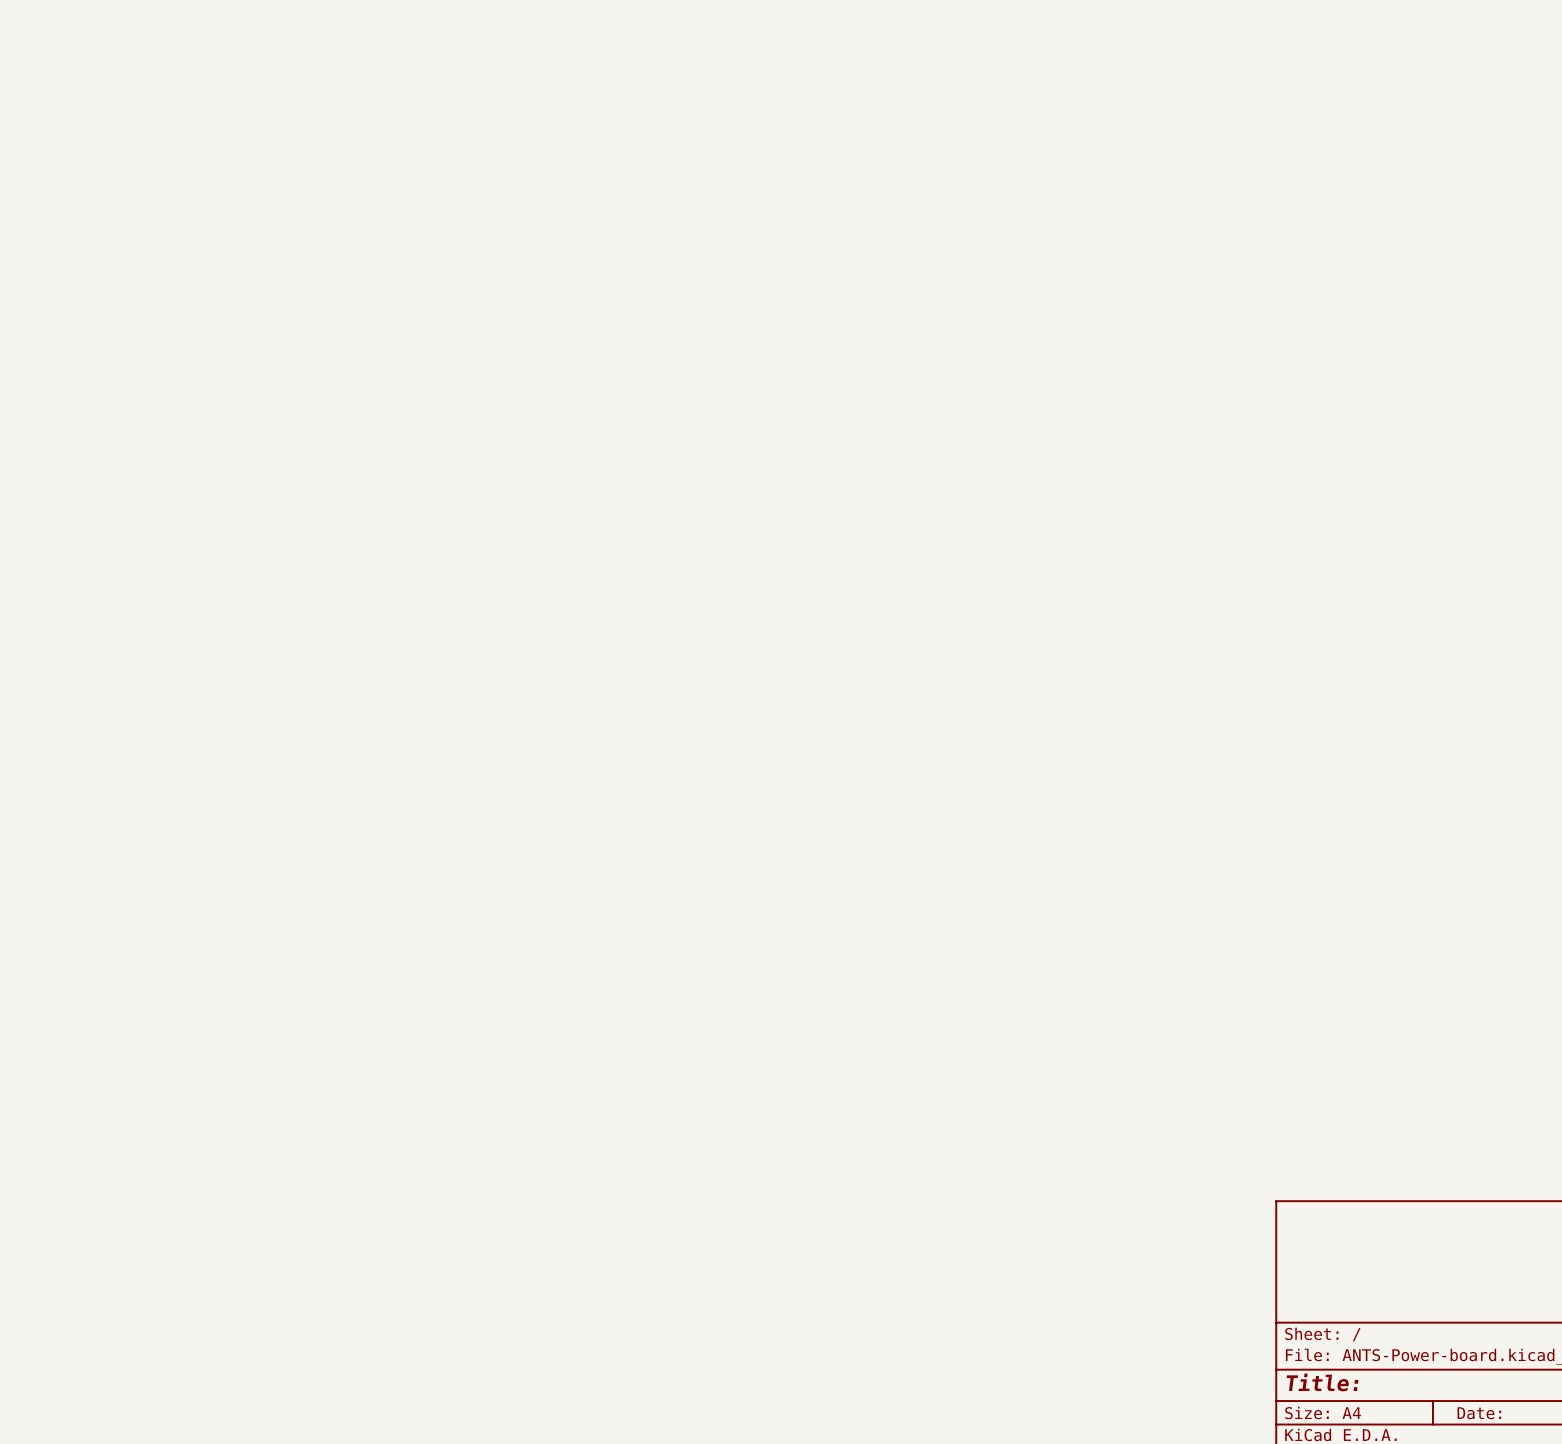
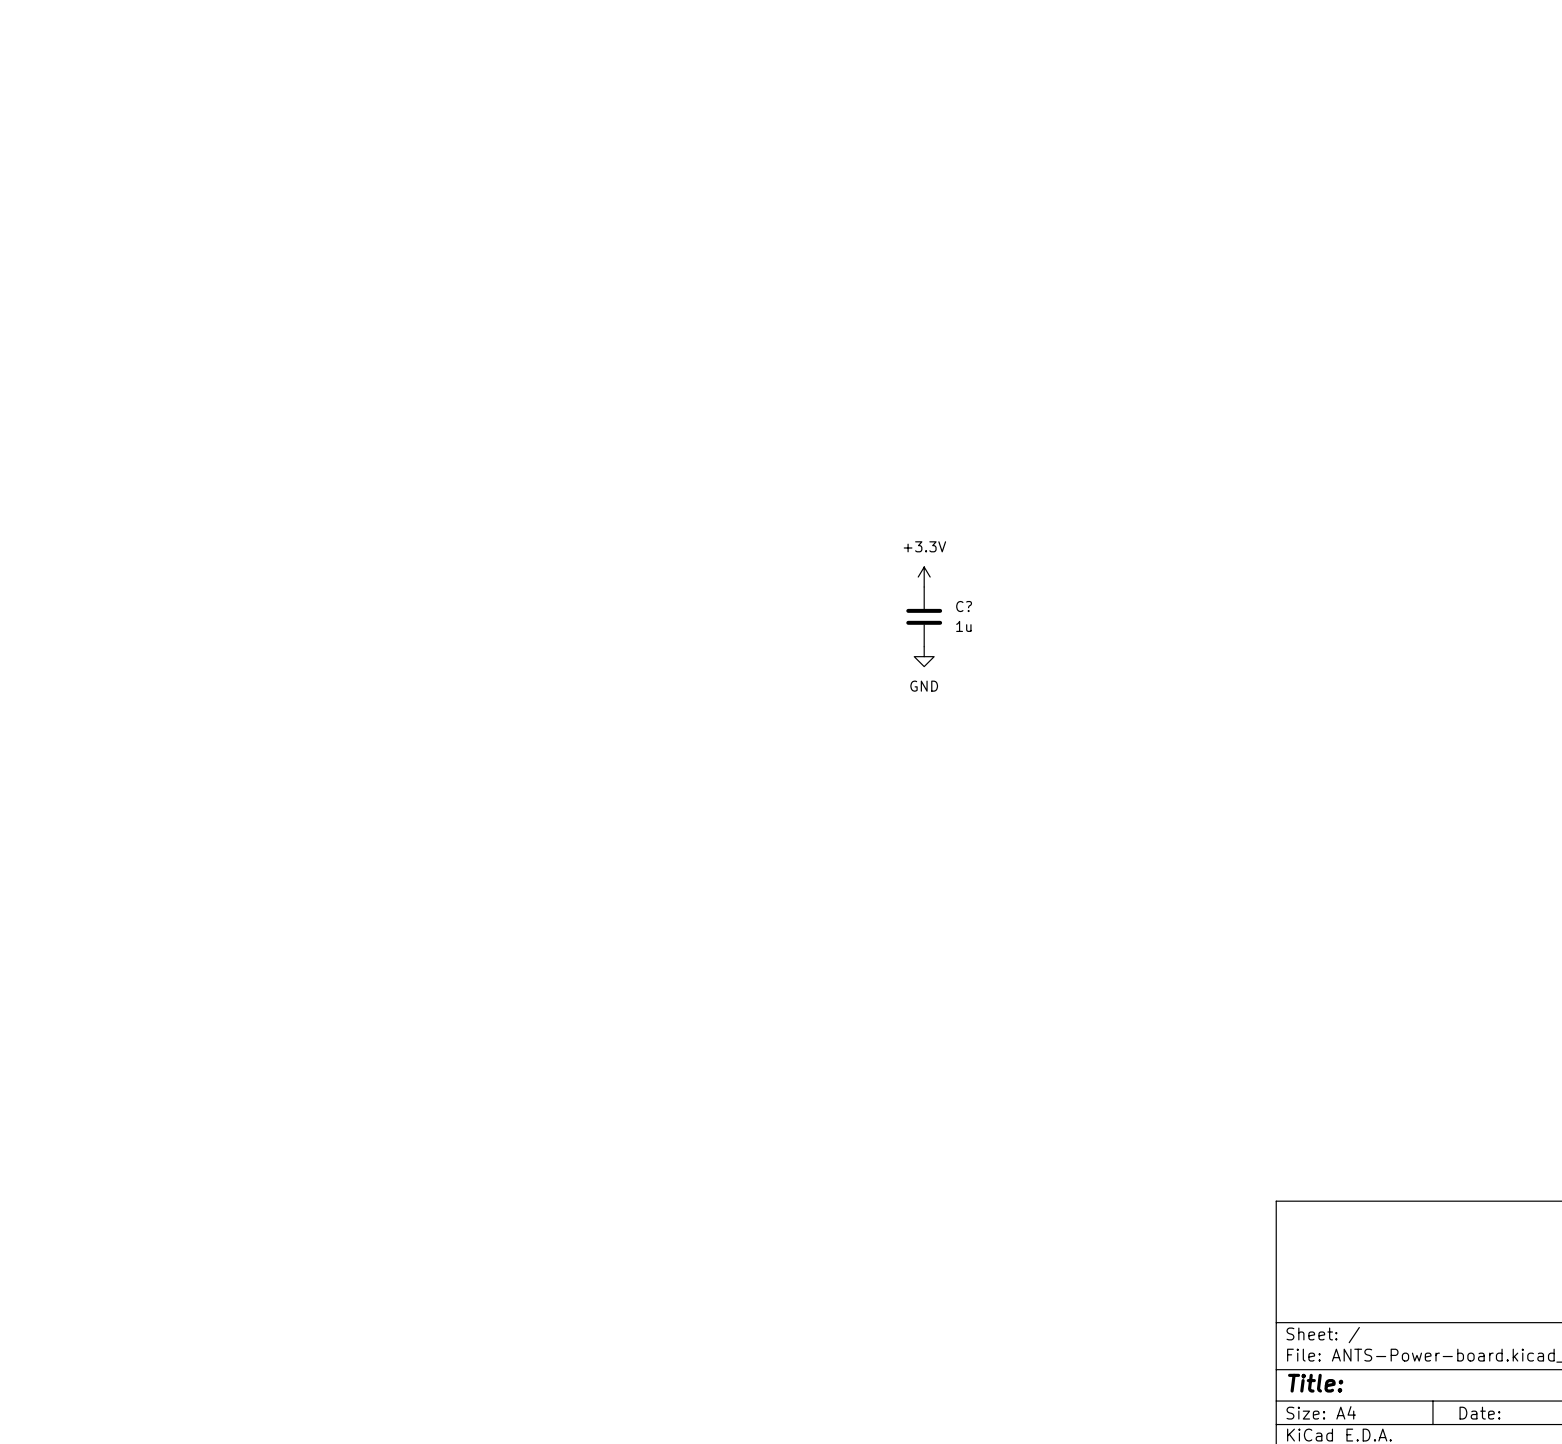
power symbol: none -> +3.3V (924, 577)
C?: none -> 1u (924, 616)
power symbol: none -> GND (924, 656)

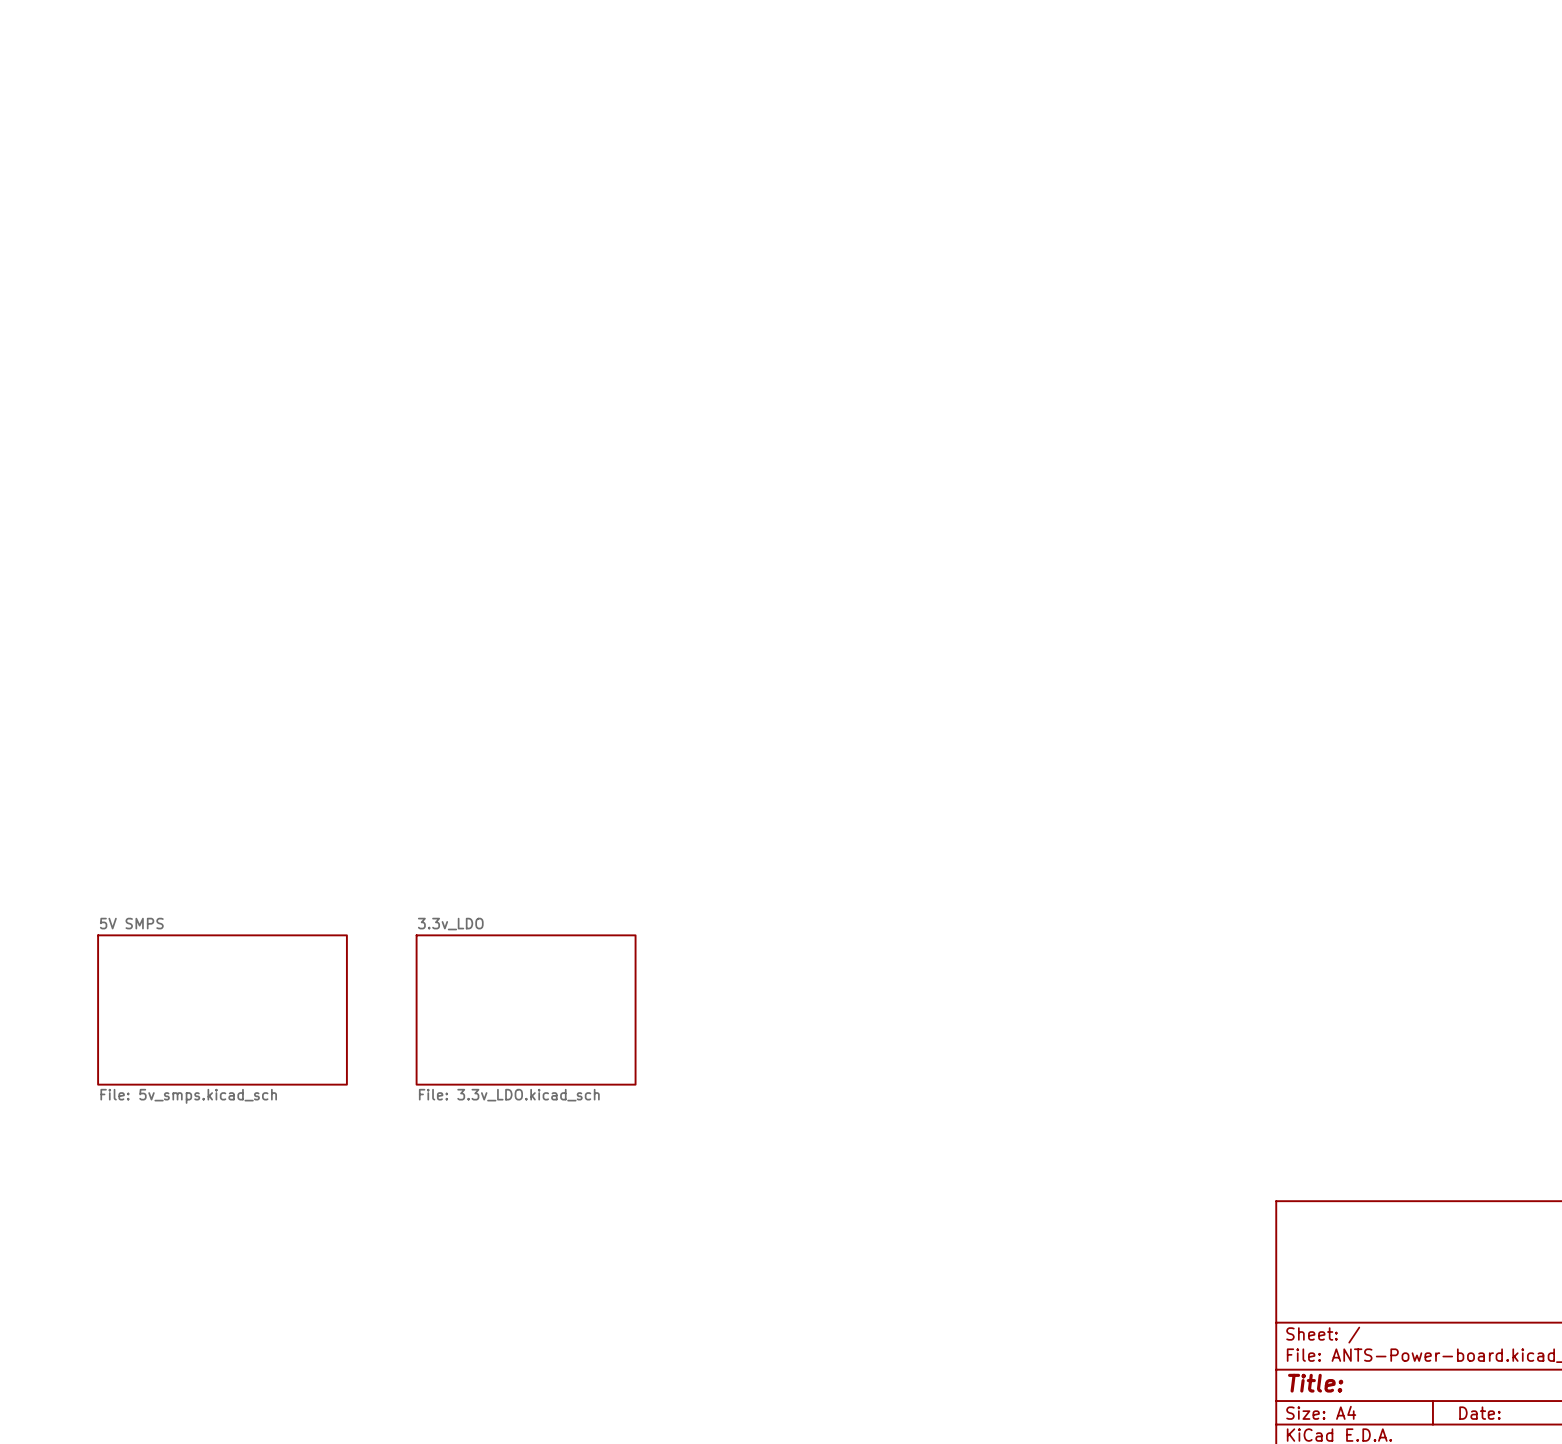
power symbol: +3.3V (924, 577) -> none
C?: 1u (924, 616) -> none
power symbol: GND (924, 656) -> none
sheet 5V SMPS: none -> File: 5v_smps.kicad_sch (222, 1009)
sheet 3.3v_LDO: none -> File: 3.3v_LDO.kicad_sch (526, 1009)

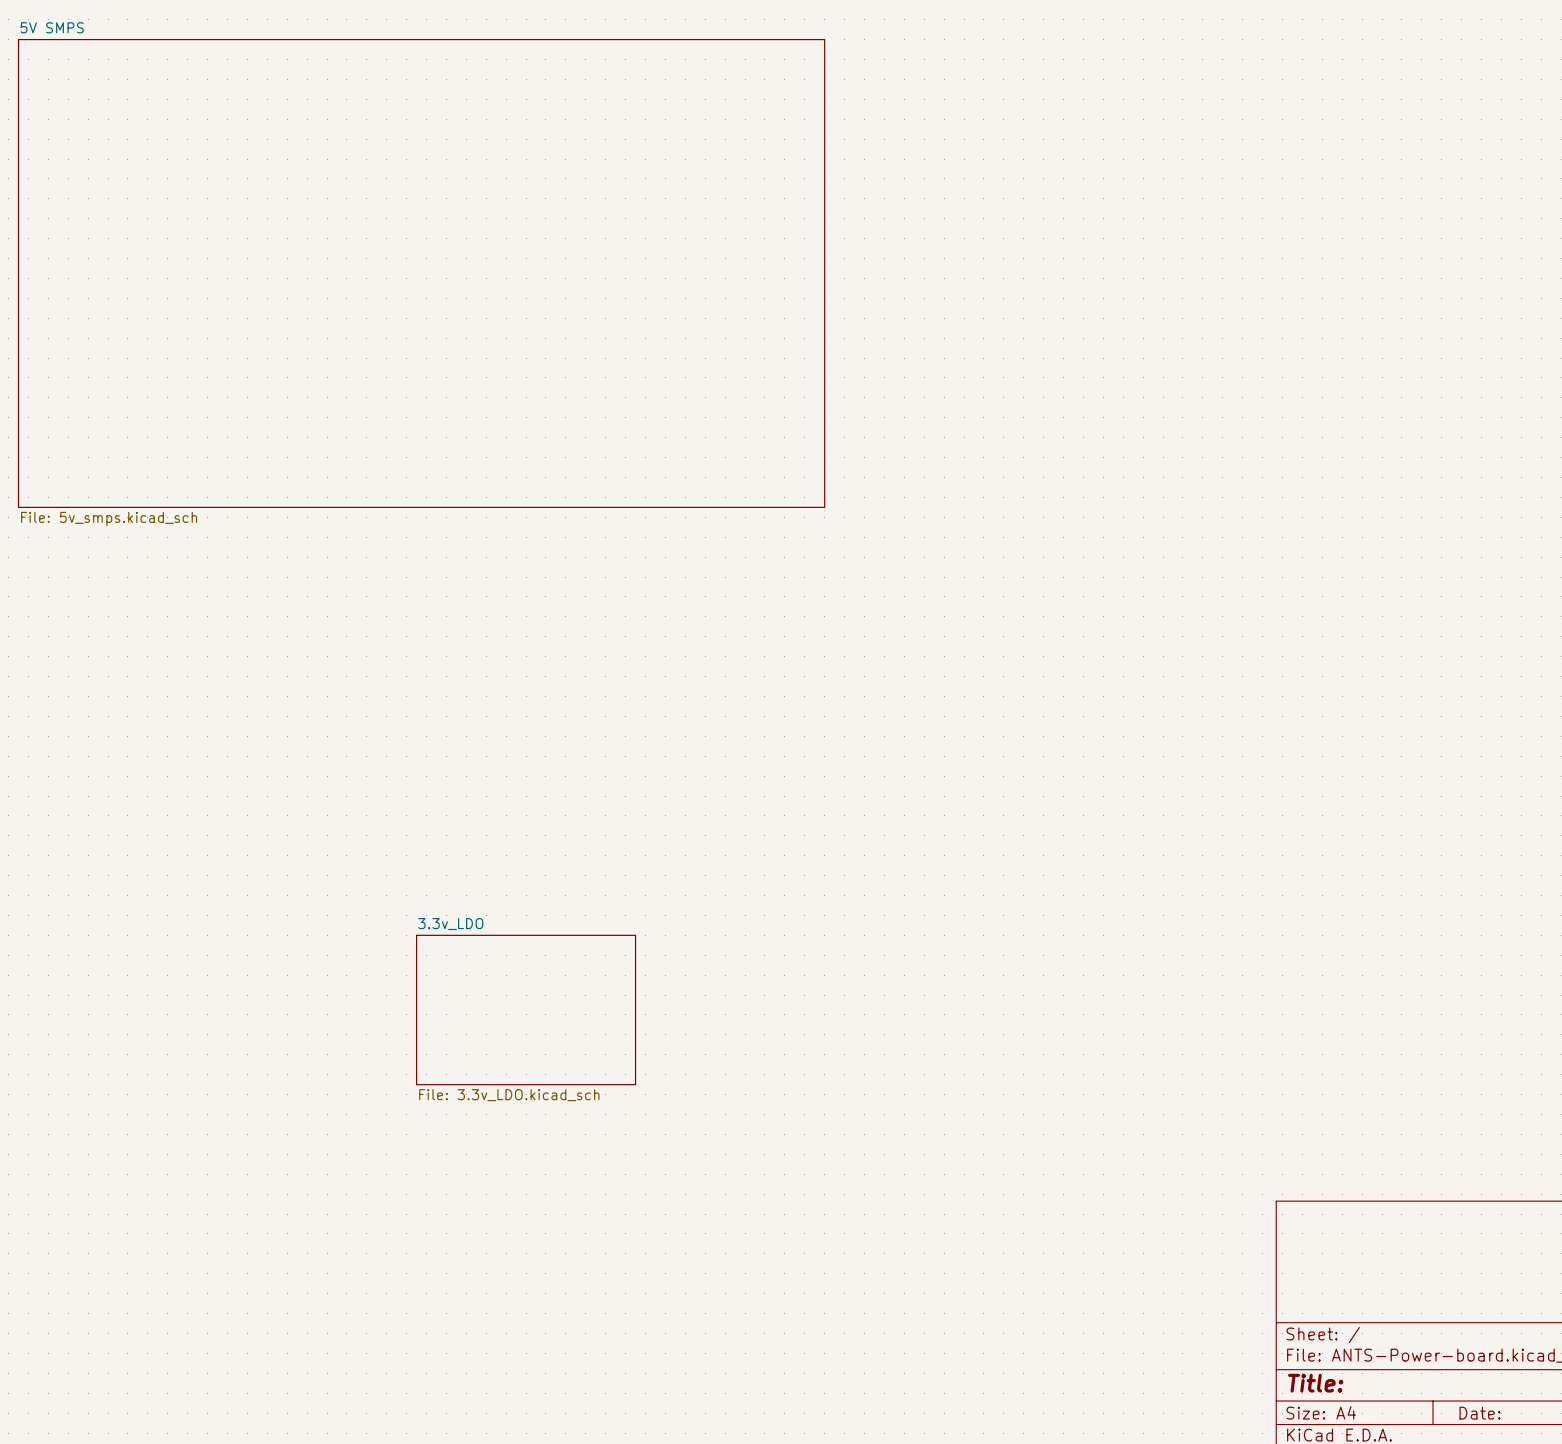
sheet 5V SMPS name position: 5V SMPS (131, 923) -> 5V SMPS (52, 27)
sheet 5V SMPS shape: [97, 934, 348, 1086] -> [17, 38, 826, 508]
sheet 5V SMPS value position: File: 5v_smps.kicad_sch (188, 1096) -> File: 5v_smps.kicad_sch (109, 519)

